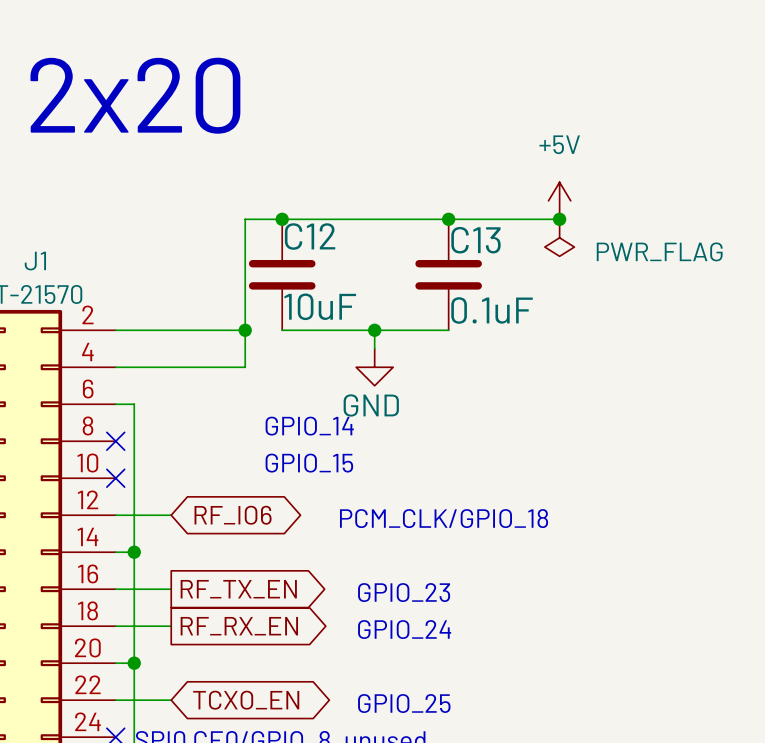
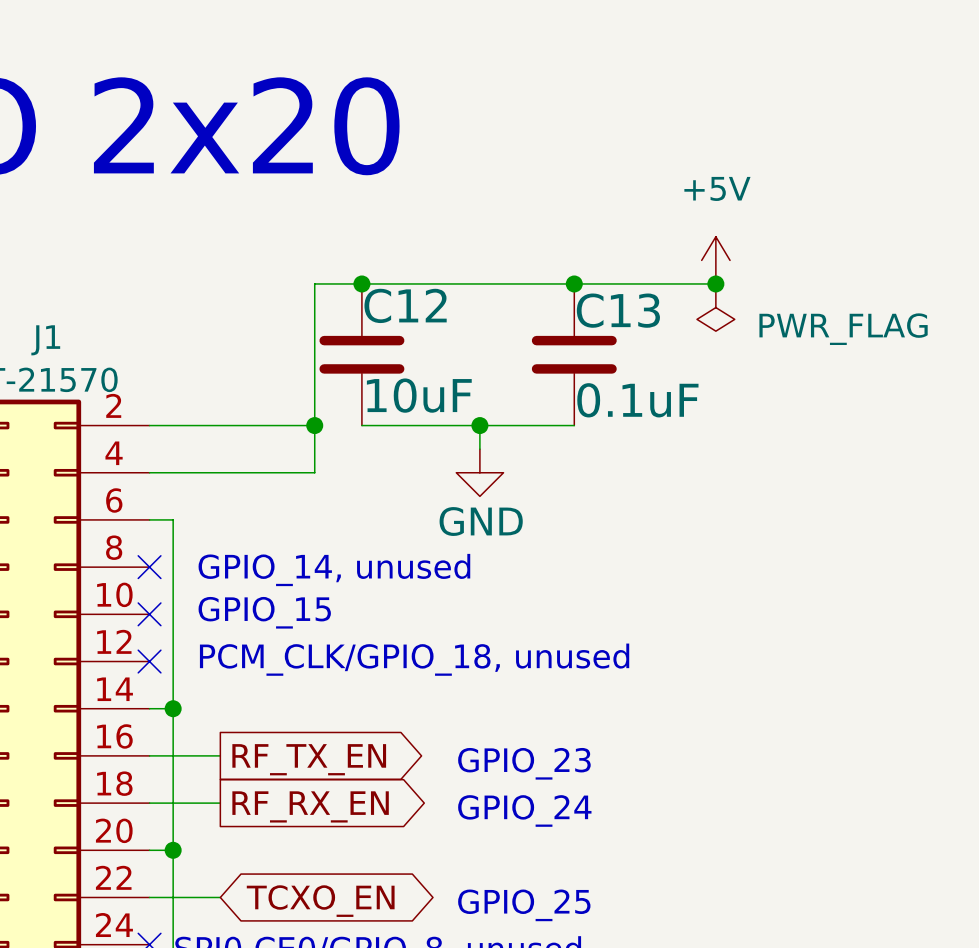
text: GPIO_14 (309, 426) -> GPIO_14, unused (334, 570)
text position: GPIO_15 (309, 463) -> GPIO_15 (264, 612)
wire: (115, 515) (171, 515) -> none
no-connect mark: none -> (149, 661)
global label: RF_IO6 (233, 515) -> none
text: PCM_CLK/GPIO_18 (444, 518) -> PCM_CLK/GPIO_18, unused (414, 659)

